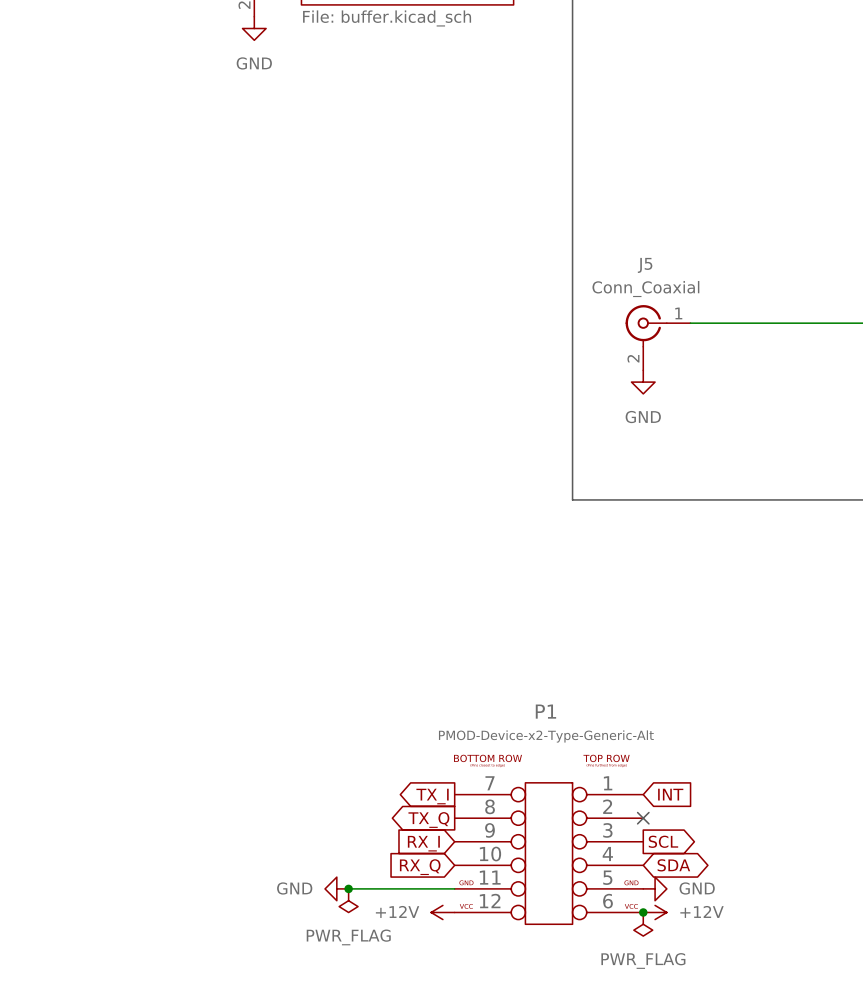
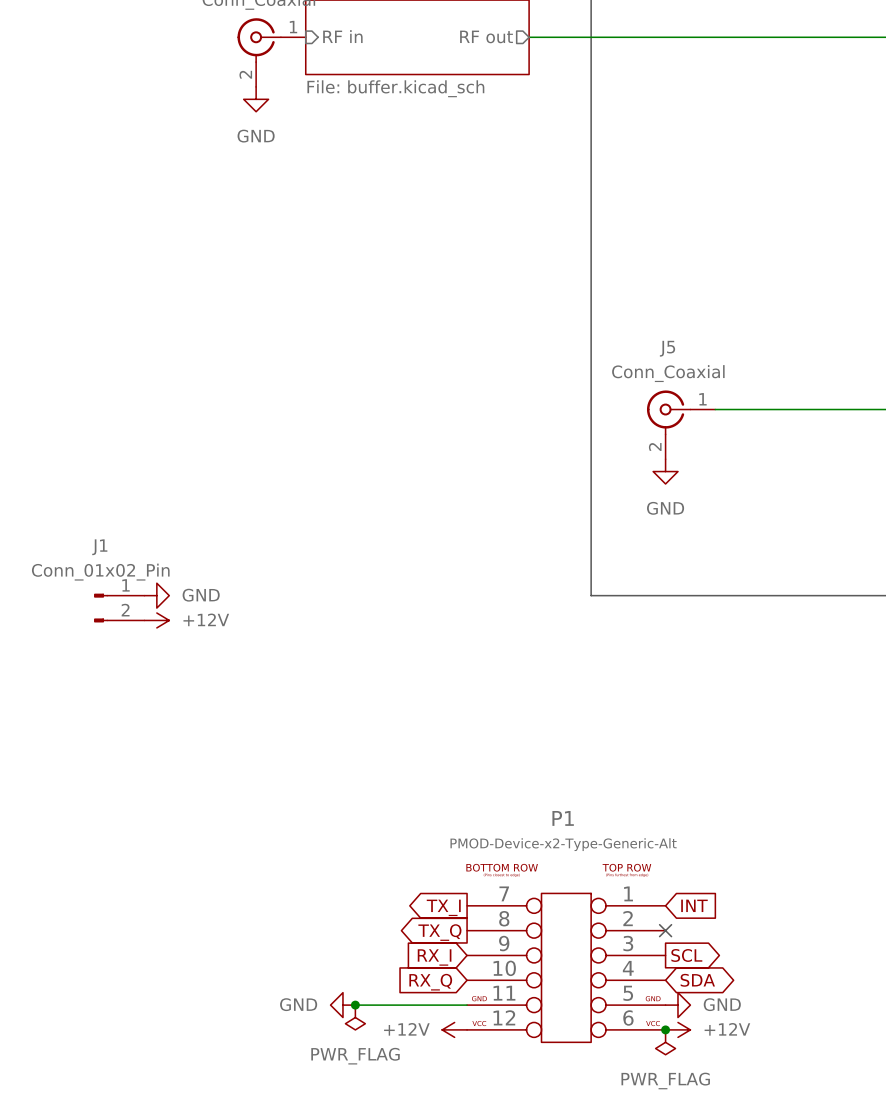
power symbol: none -> GND (156, 595)
J1: none -> Conn_01x02_Pin (119, 608)
power symbol: none -> +12V (156, 620)

